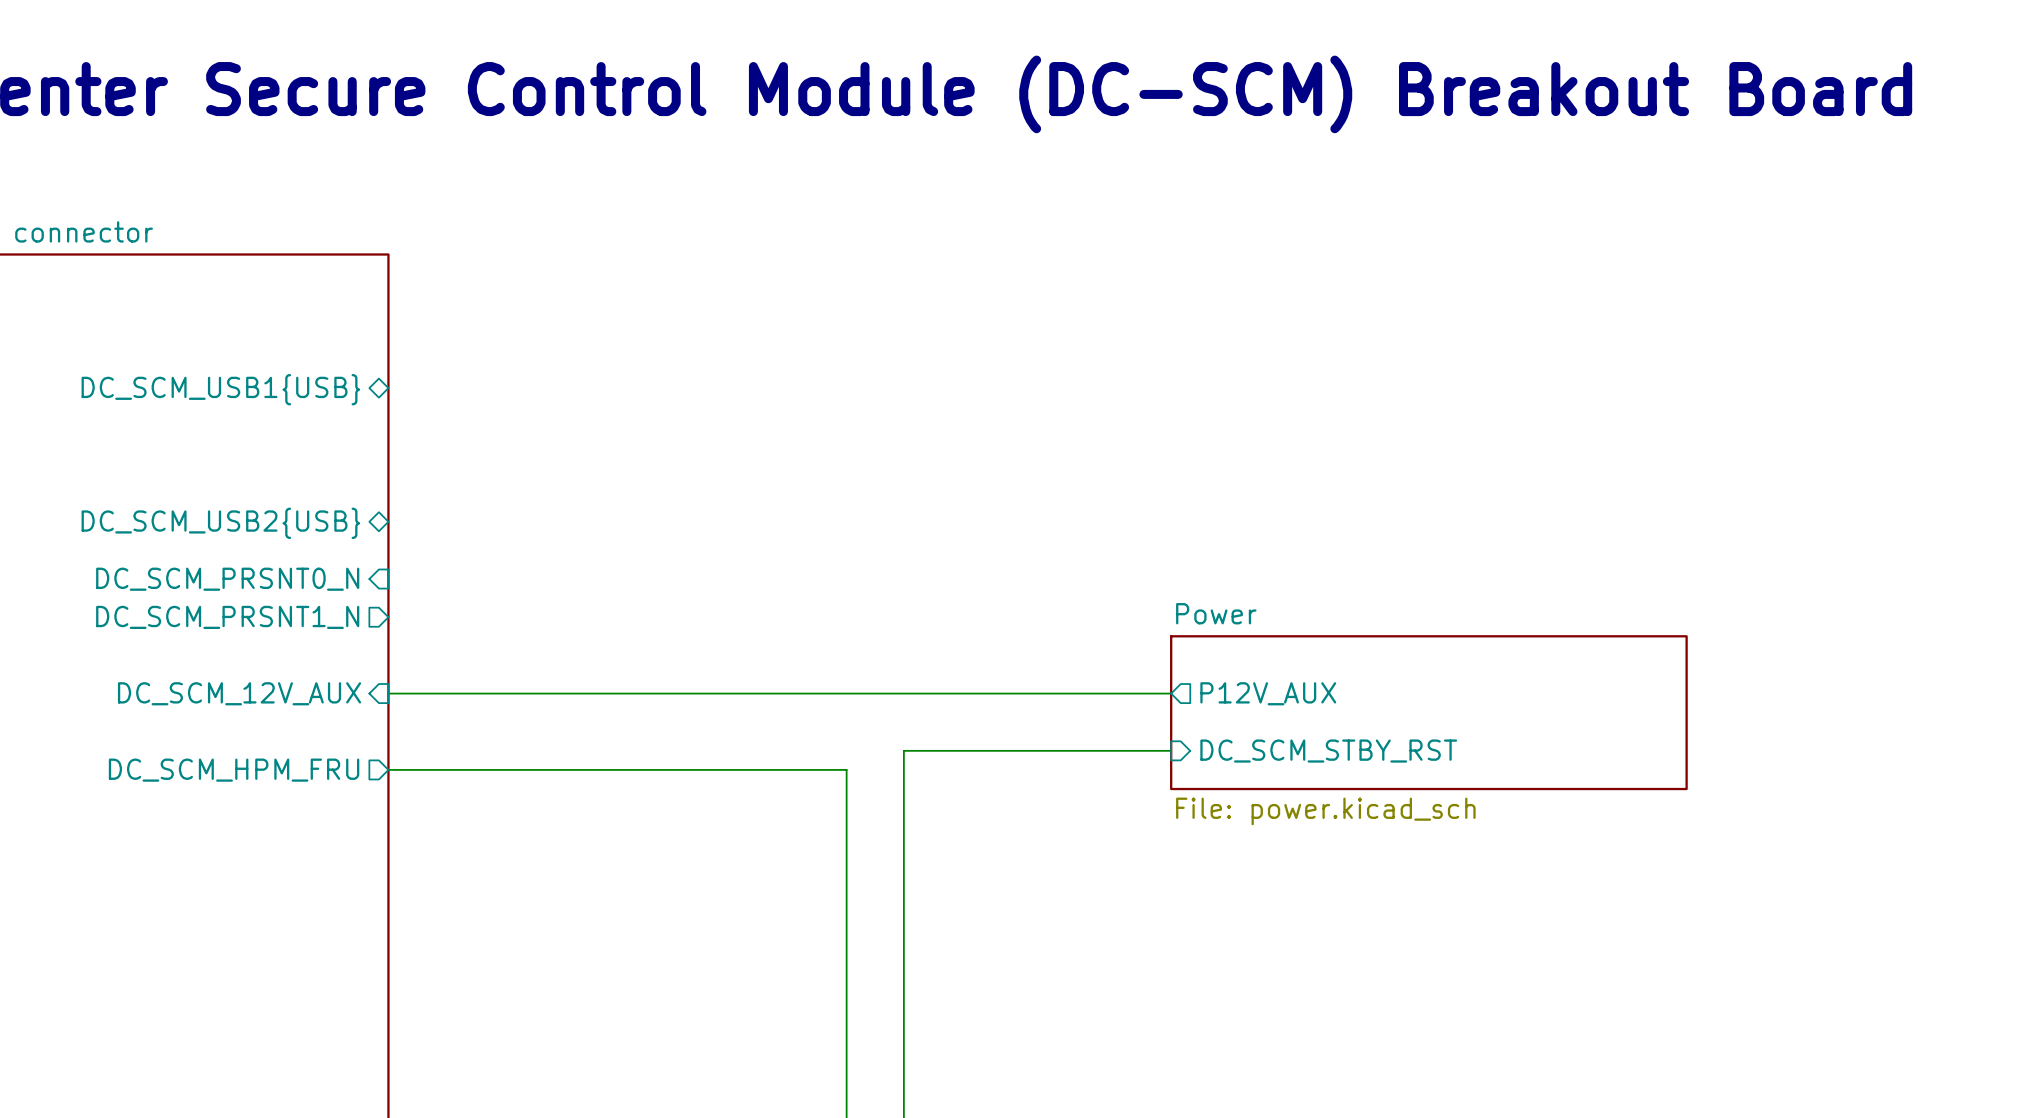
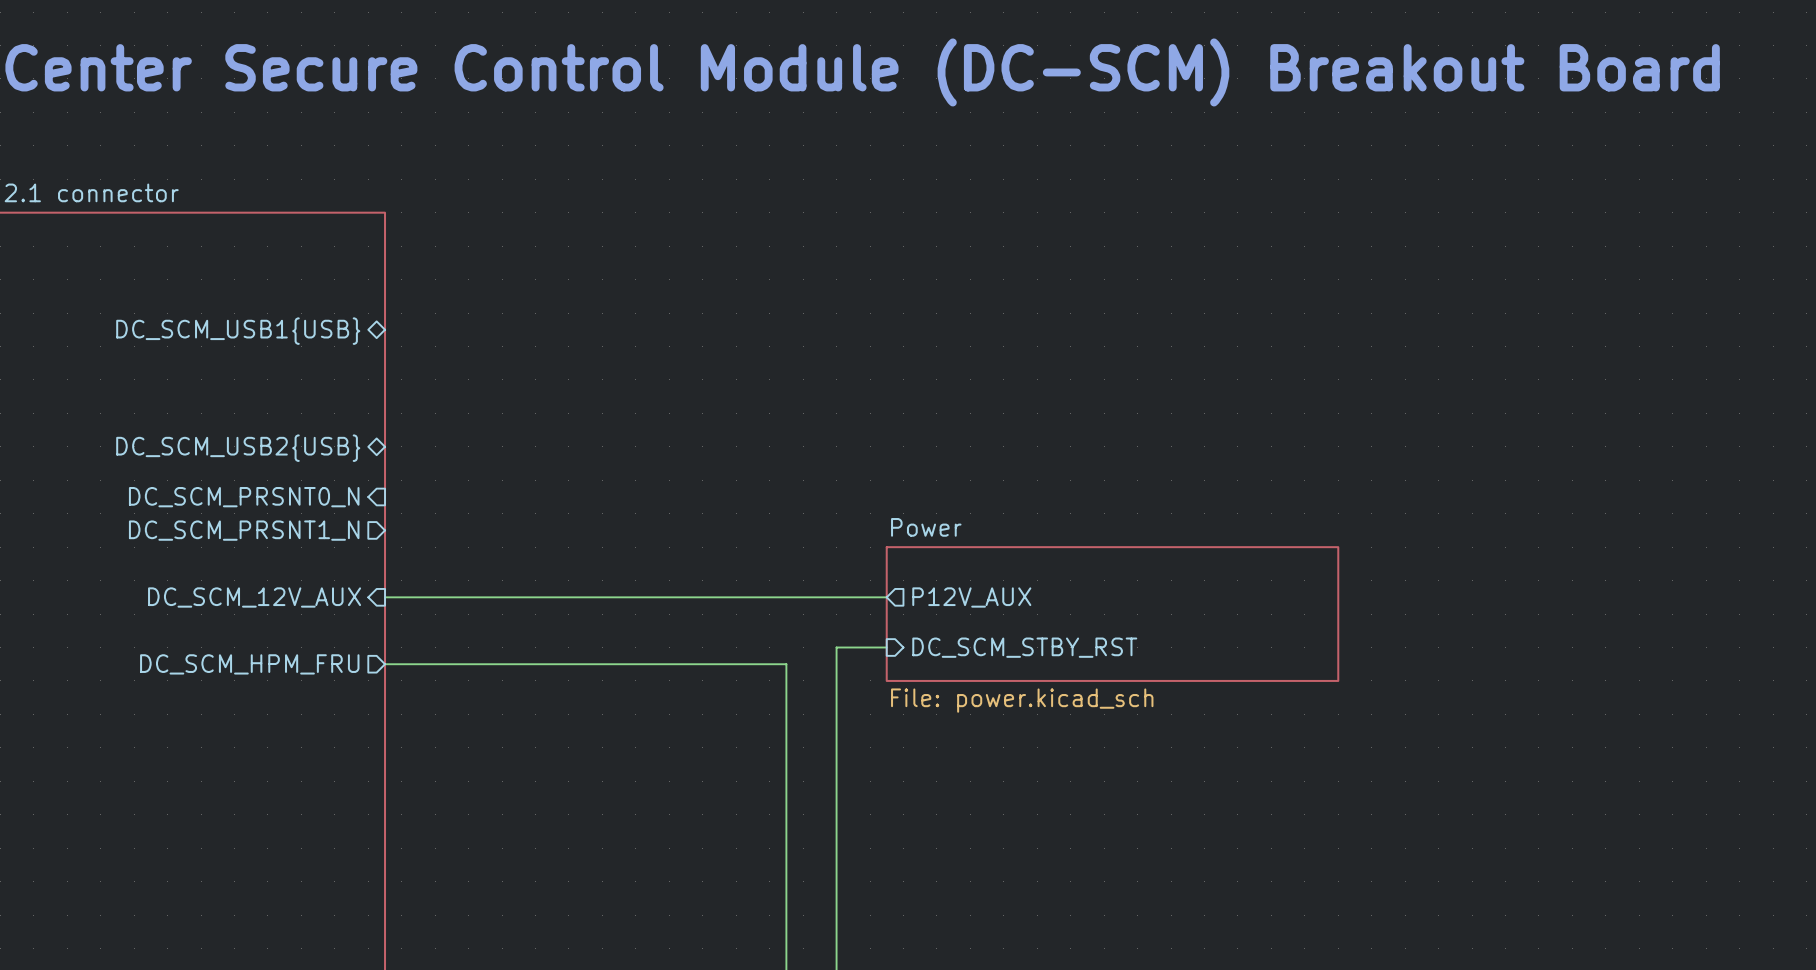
wire: (961, 693) (1171, 693) -> none
sheet pin position: P12V_AUX (1268, 693) -> P12V_AUX (971, 597)
sheet Power position: (1428, 712) -> (1112, 614)
wire: (961, 750) (1171, 750) -> none
sheet pin position: DC_SCM_STBY_RST (1328, 751) -> DC_SCM_STBY_RST (1024, 647)

